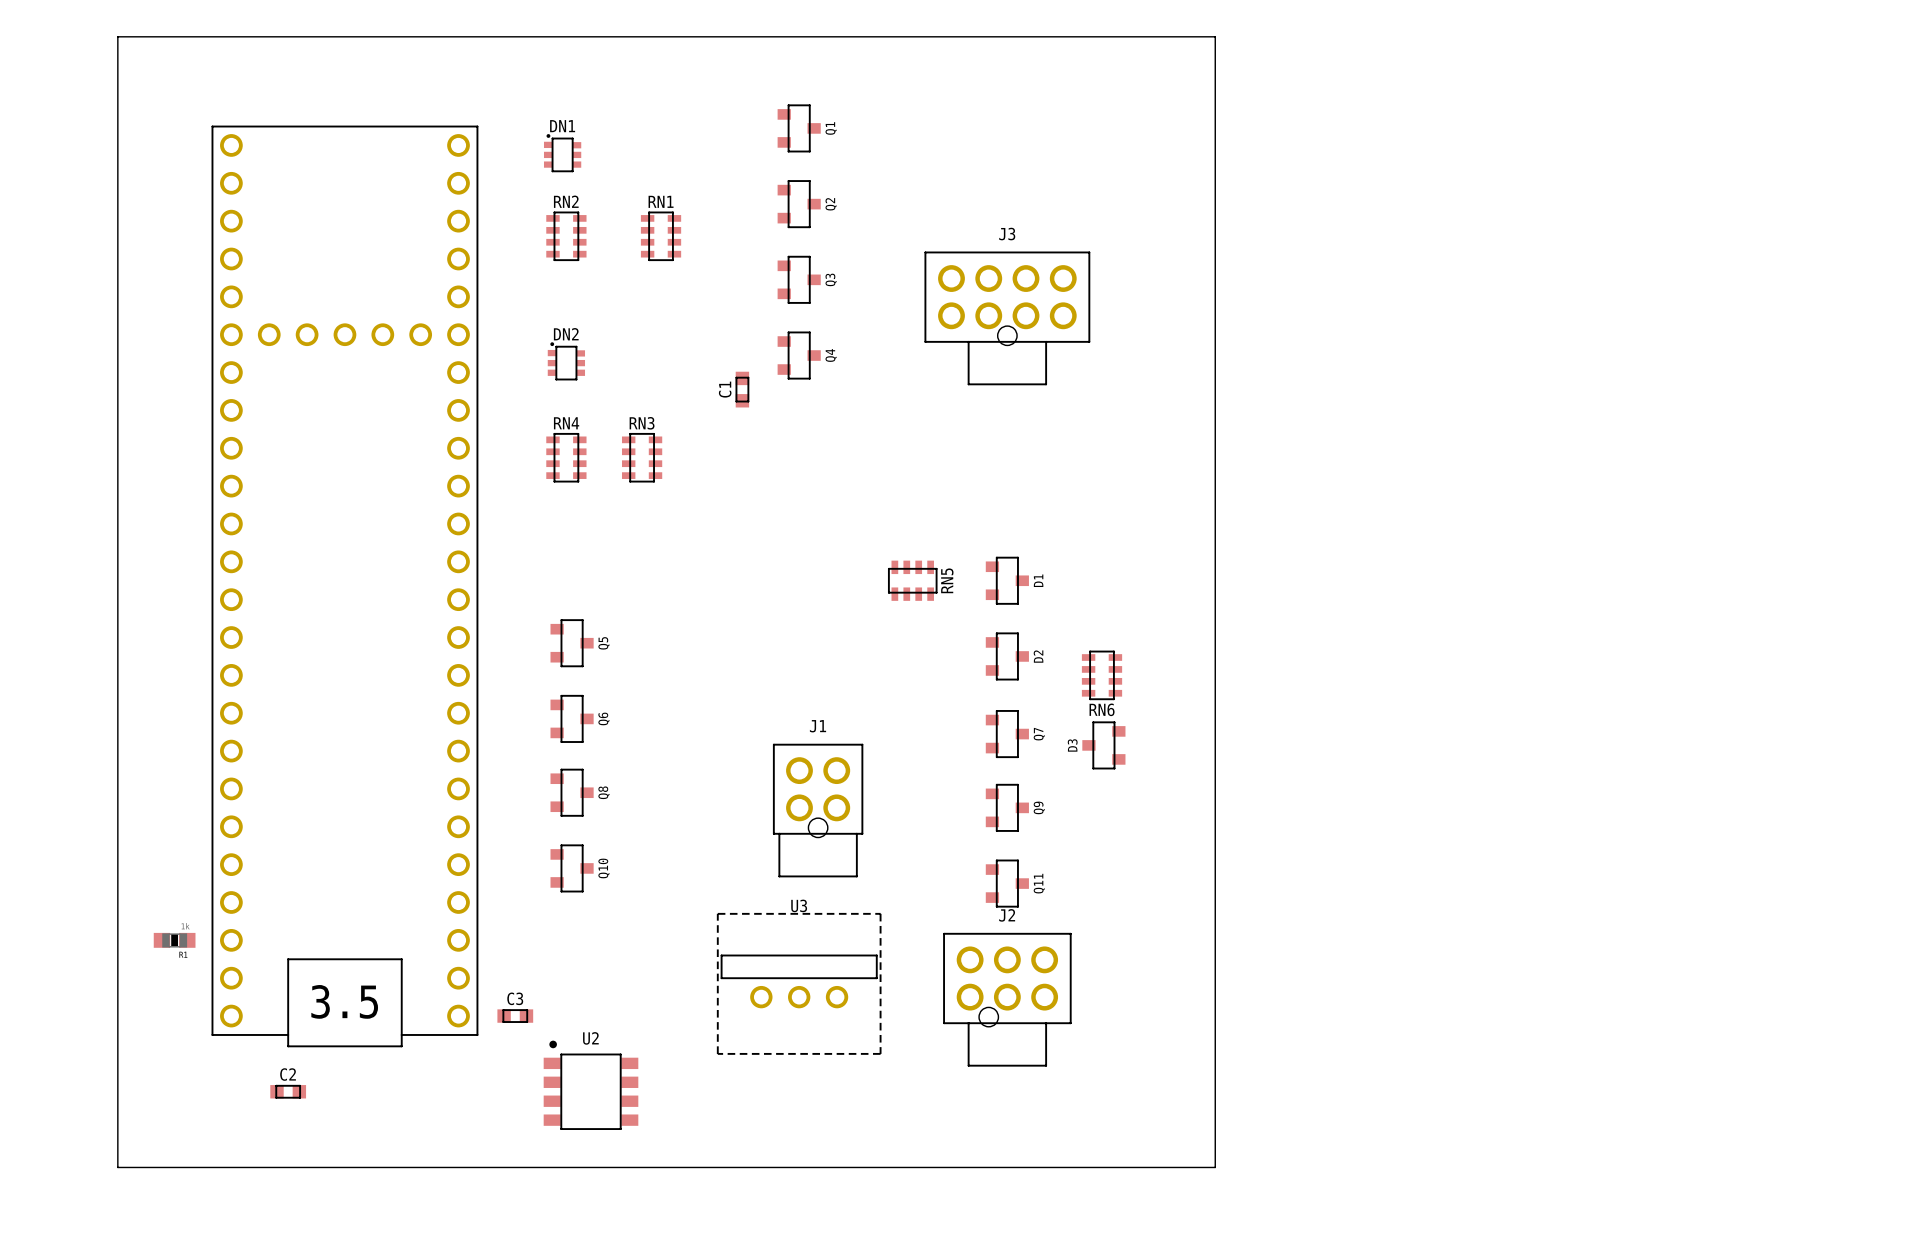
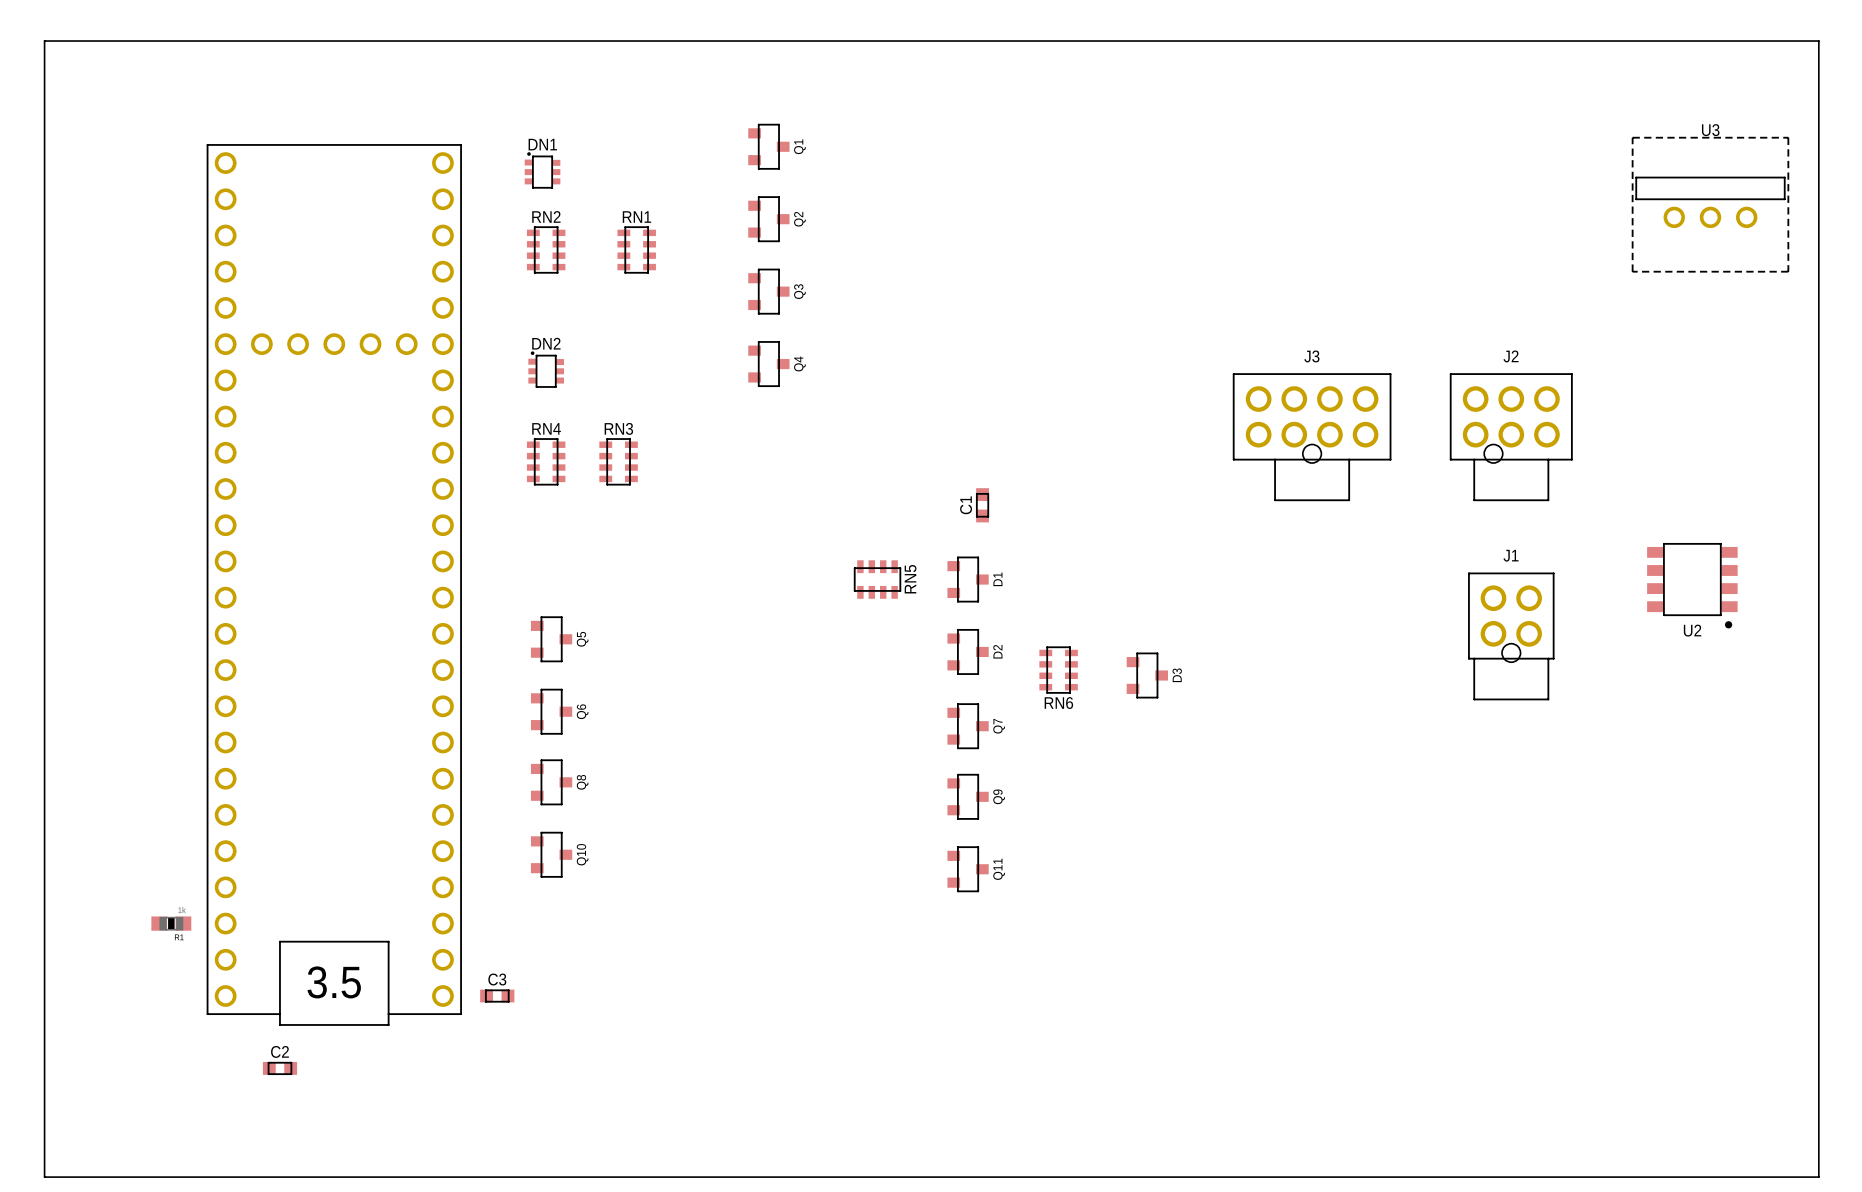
board edge: (117, 36) (1215, 36) (1215, 1167) (117, 1167) (117, 36) -> (44, 41) (44, 1177) (1818, 1177) (1818, 41) (44, 41)
J3 position: (1007, 318) -> (1312, 437)
C1 position: (742, 389) -> (982, 505)
D3 rotation: 0° (1103, 745) -> 180° (1147, 675)
D3 position: (1103, 745) -> (1147, 675)
J1 position: (818, 810) -> (1511, 636)
U3 position: (799, 983) -> (1710, 204)
J2 position: (1007, 999) -> (1511, 437)
U2 rotation: 0° (591, 1085) -> 180° (1692, 585)
U2 position: (591, 1085) -> (1692, 585)

